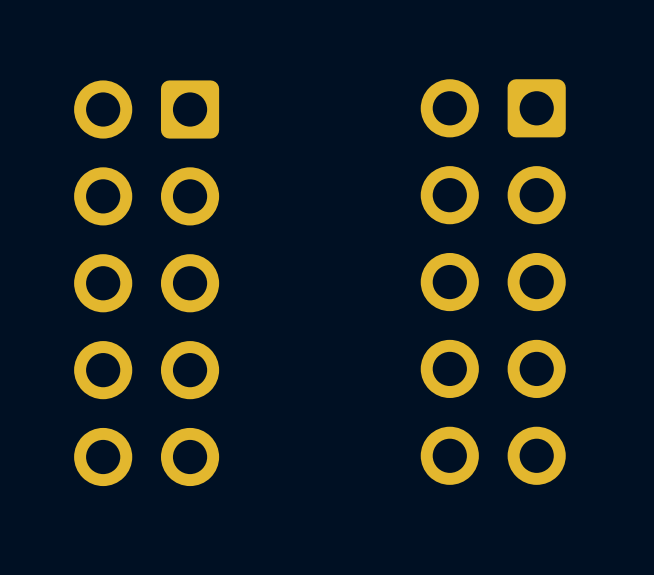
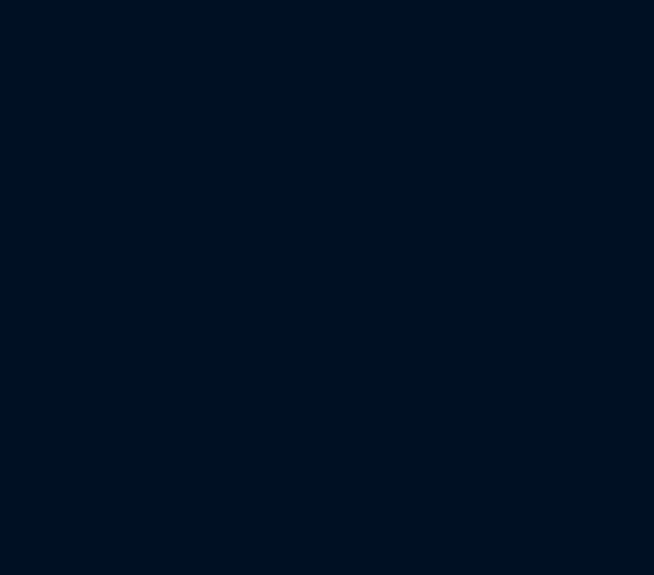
part: (493, 282) -> none
part: (146, 283) -> none

